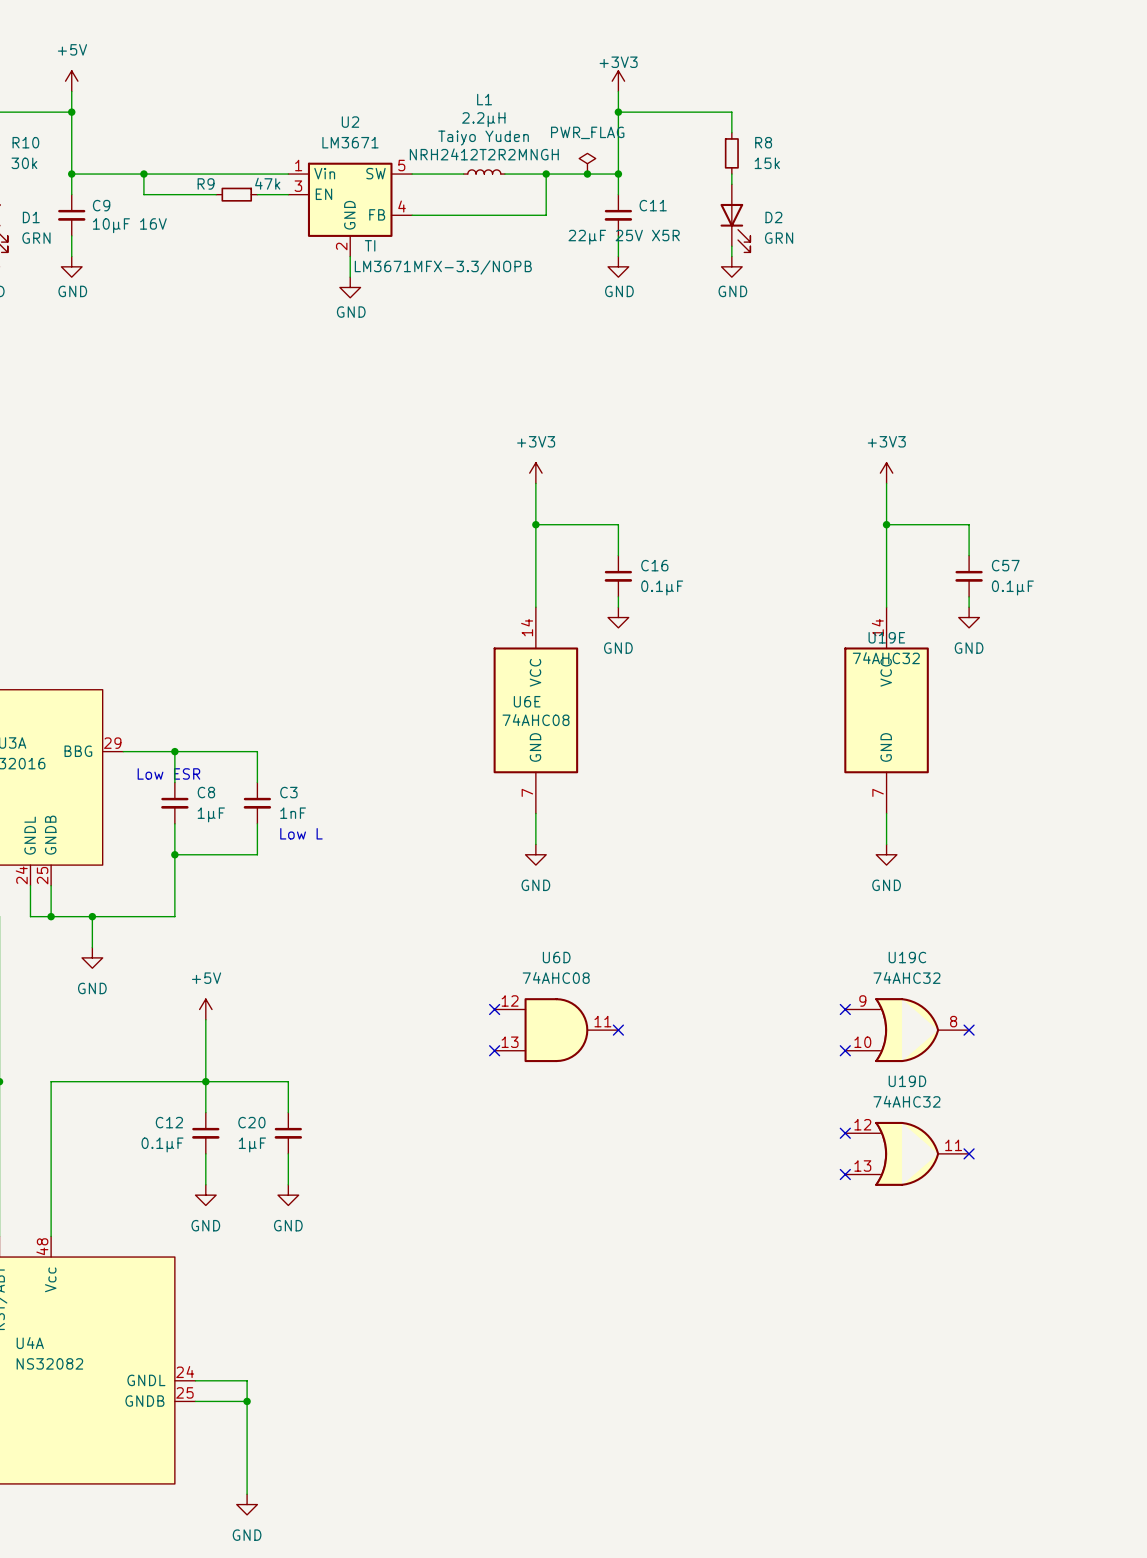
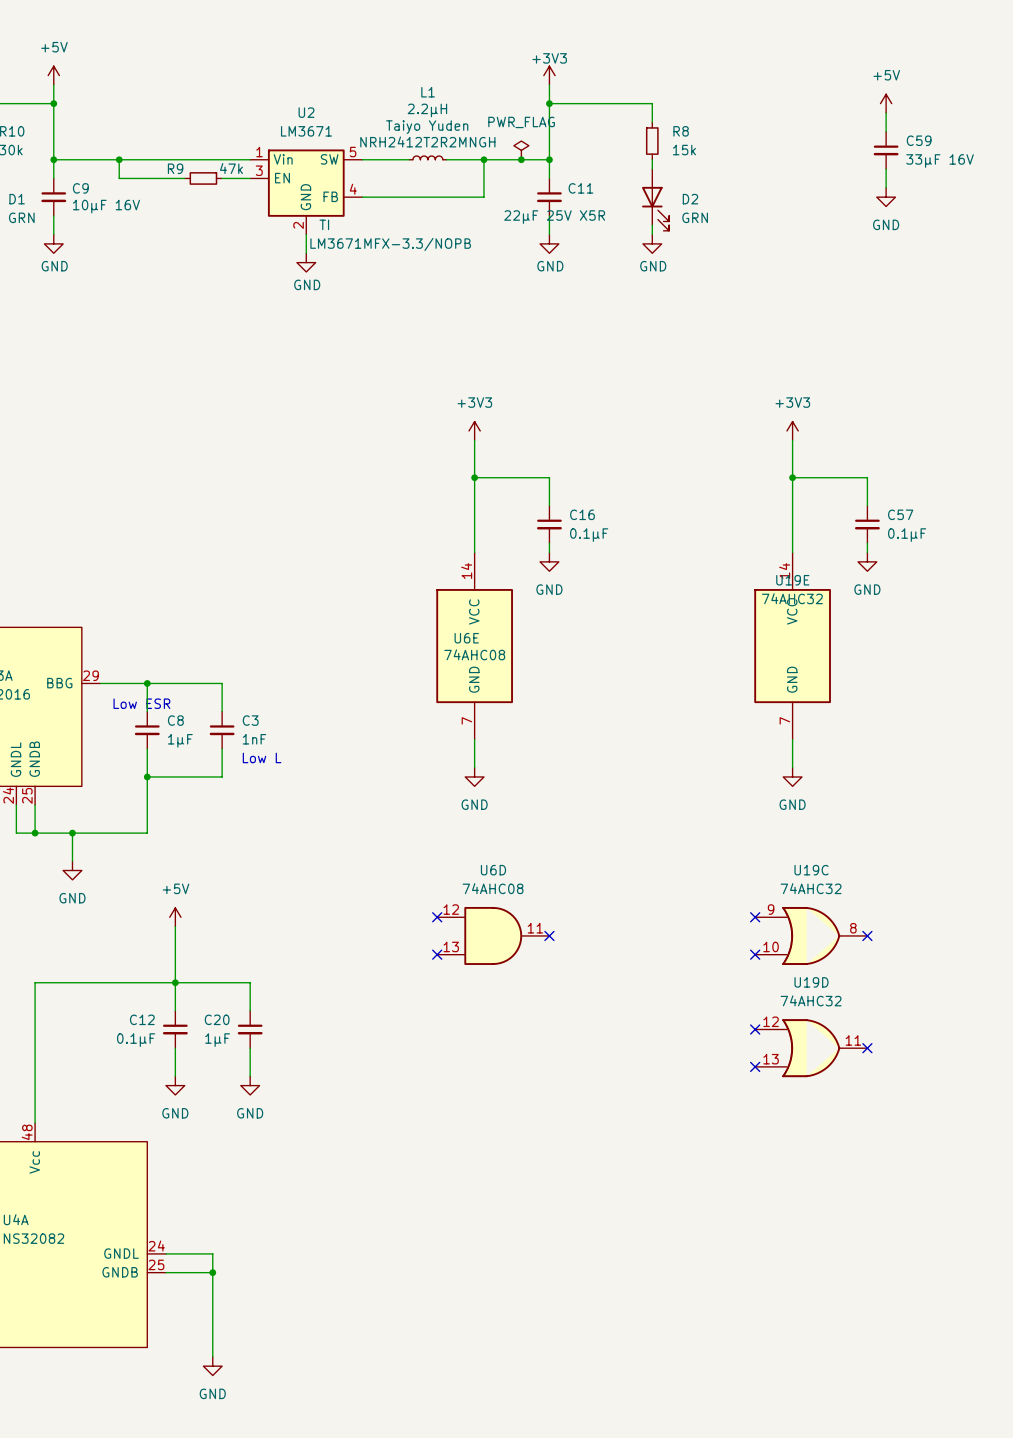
power symbol: none -> +5V (886, 103)
wire: none -> (886, 112) (886, 131)
C59: none -> 33µF 16V (886, 150)
wire: none -> (886, 169) (886, 187)
power symbol: none -> GND (886, 197)

